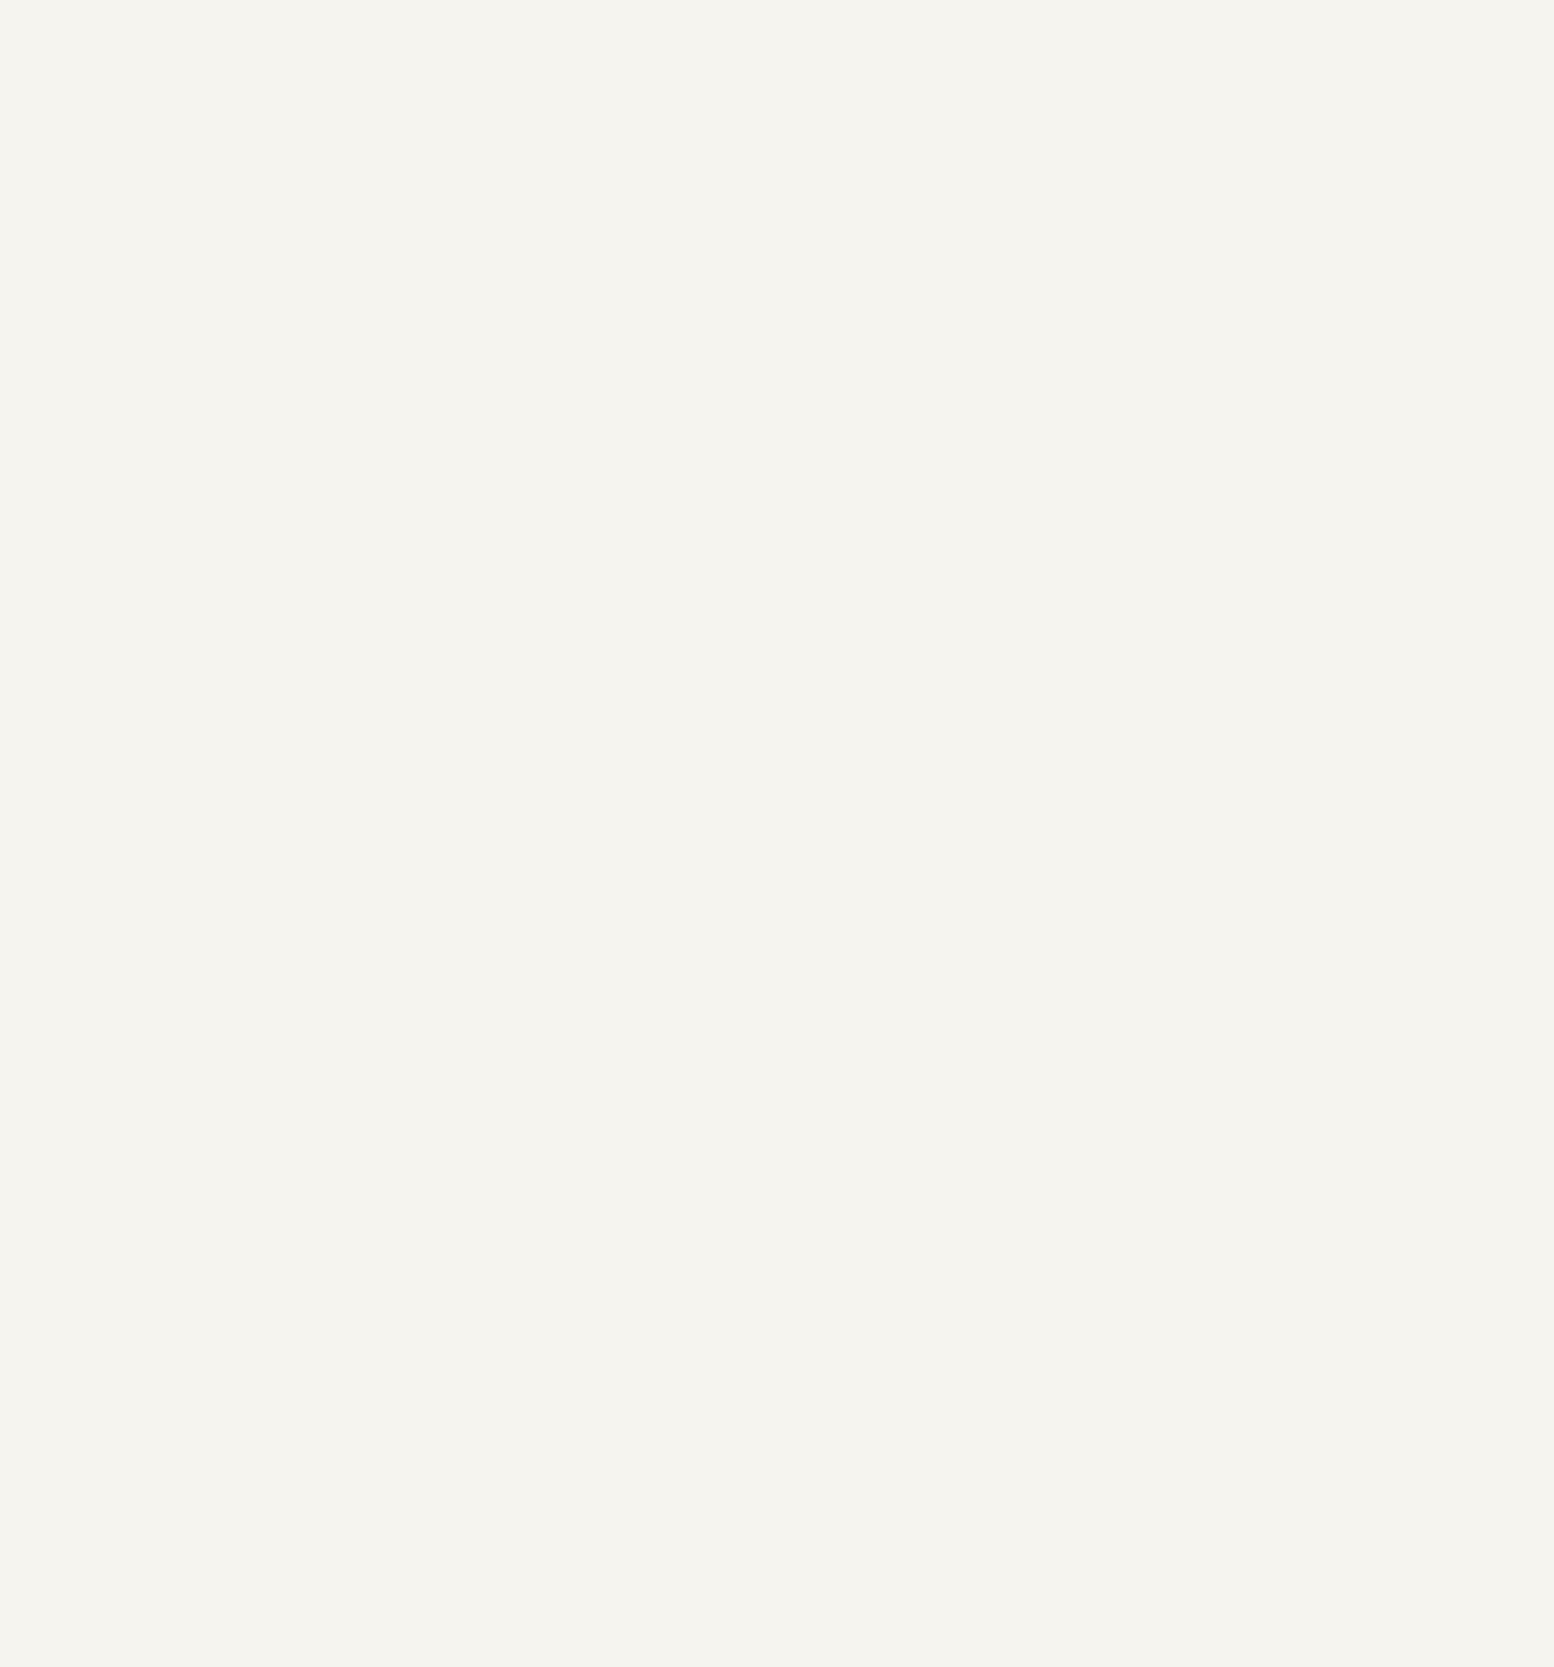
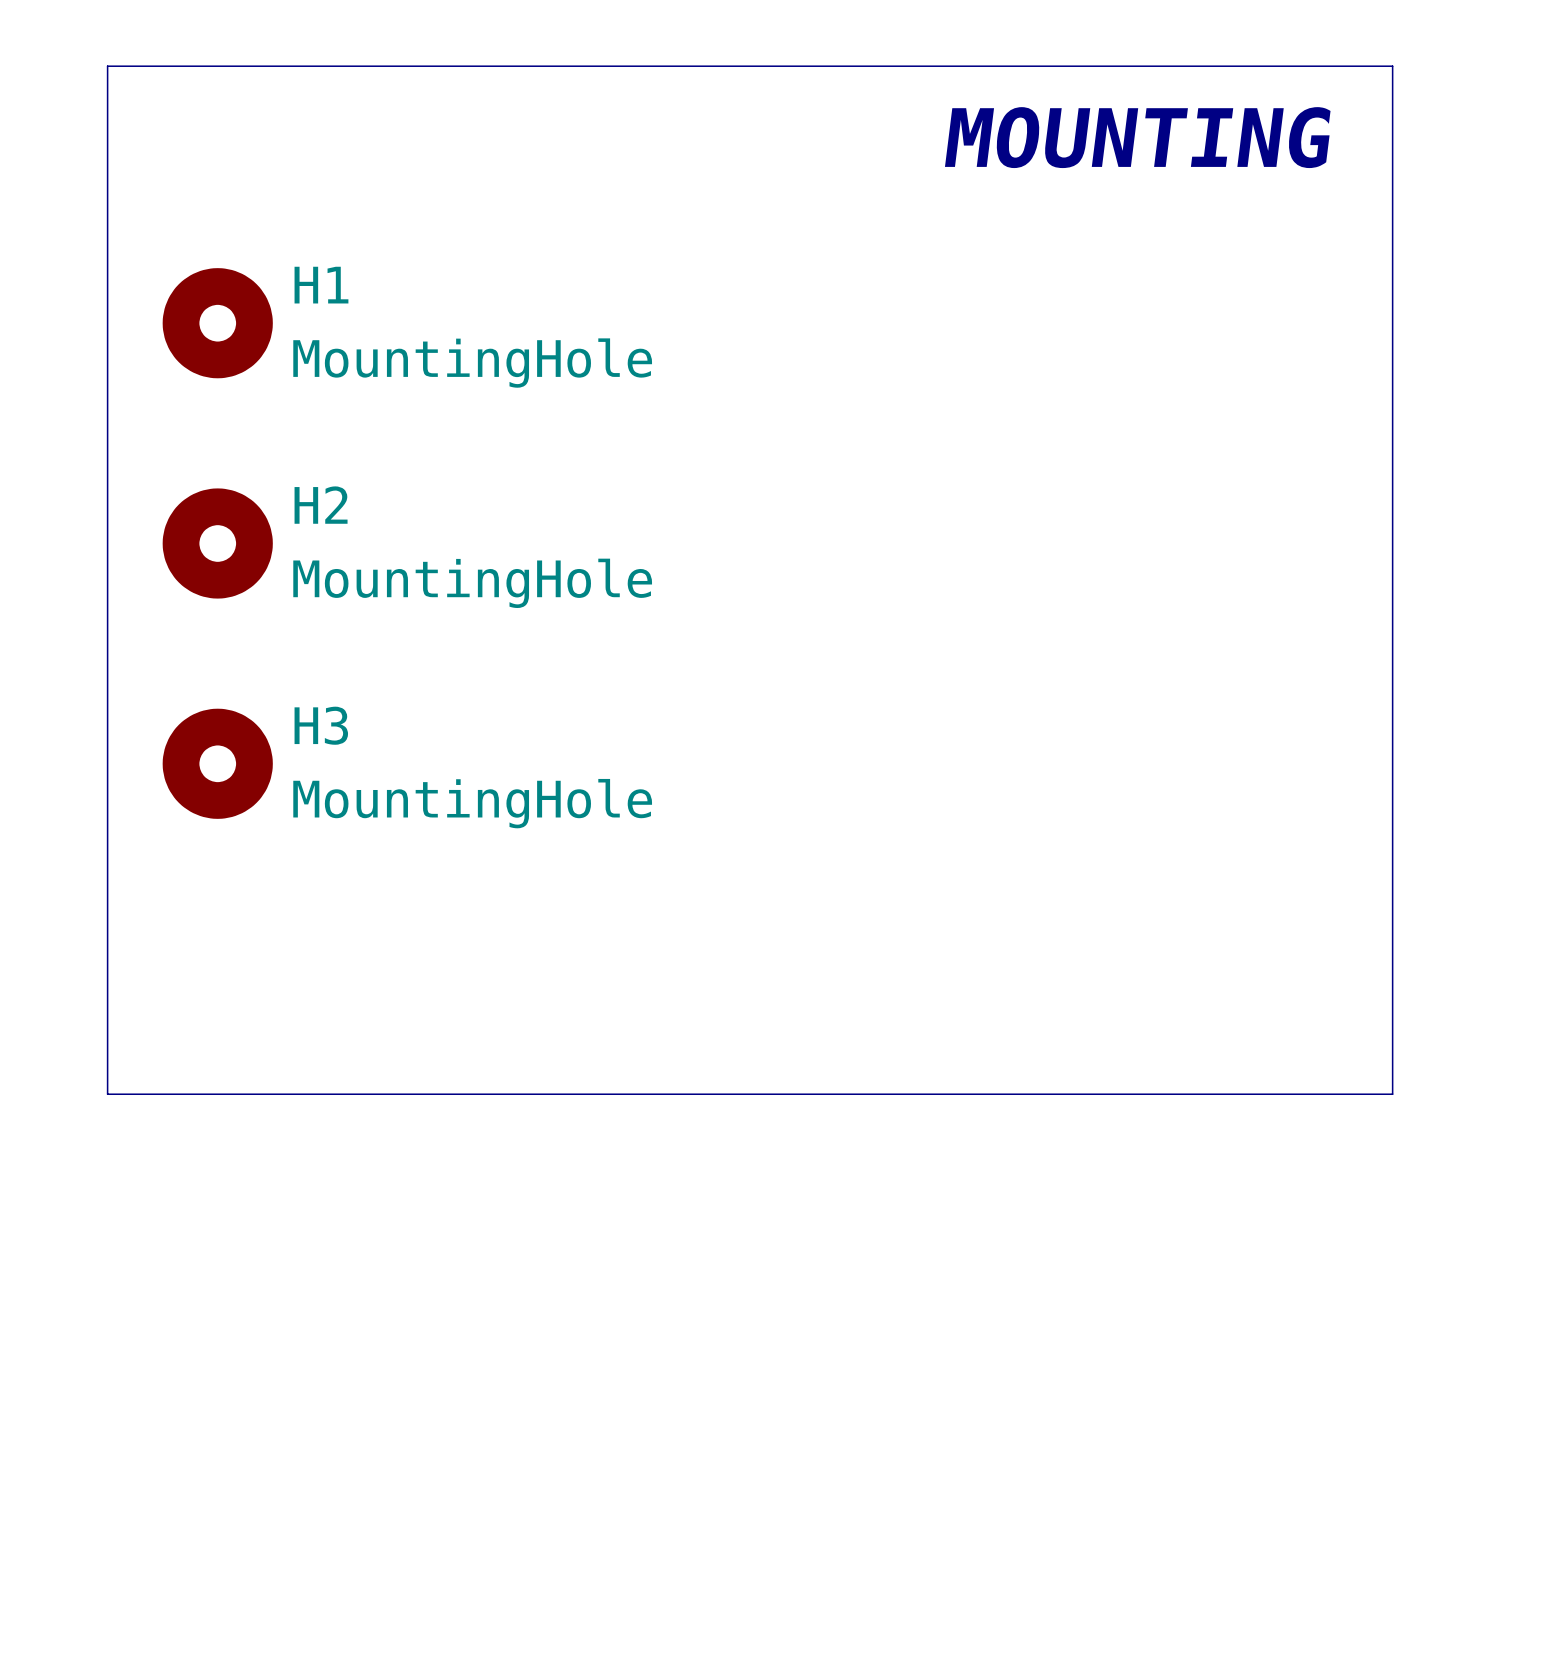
line: none -> (107, 66) (1392, 66) (1392, 1094) (107, 1094) (107, 66)
text: none -> MOUNTING (1137, 137)
H1: none -> MountingHole (217, 323)
H2: none -> MountingHole (217, 543)
H3: none -> MountingHole (217, 763)

